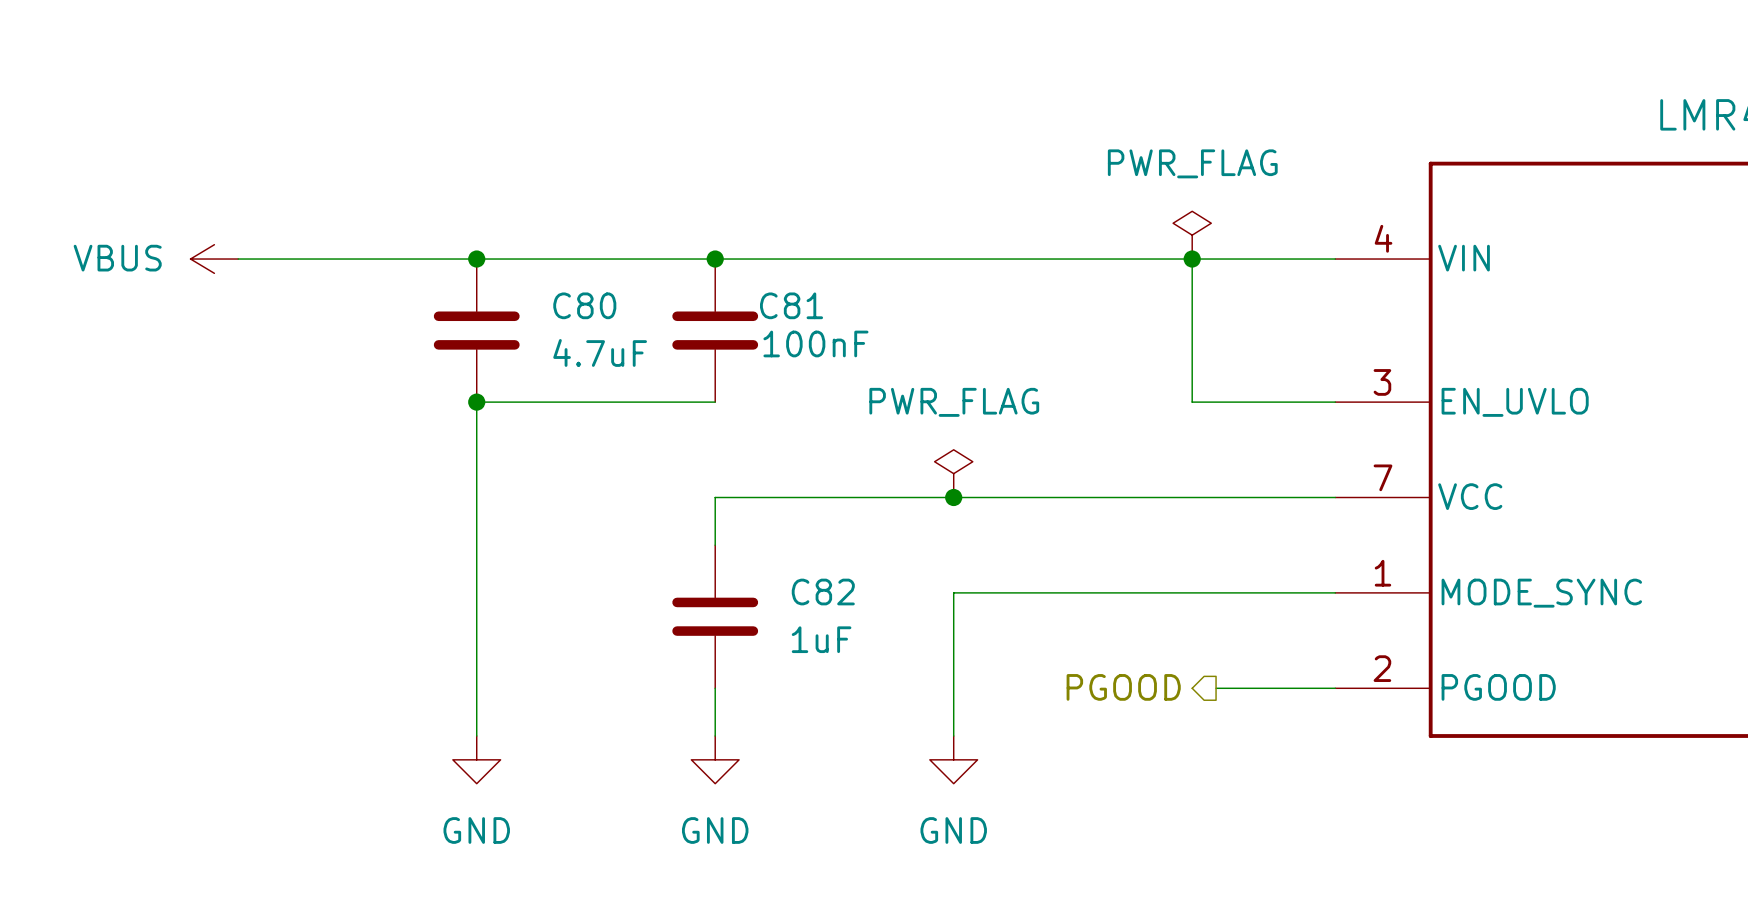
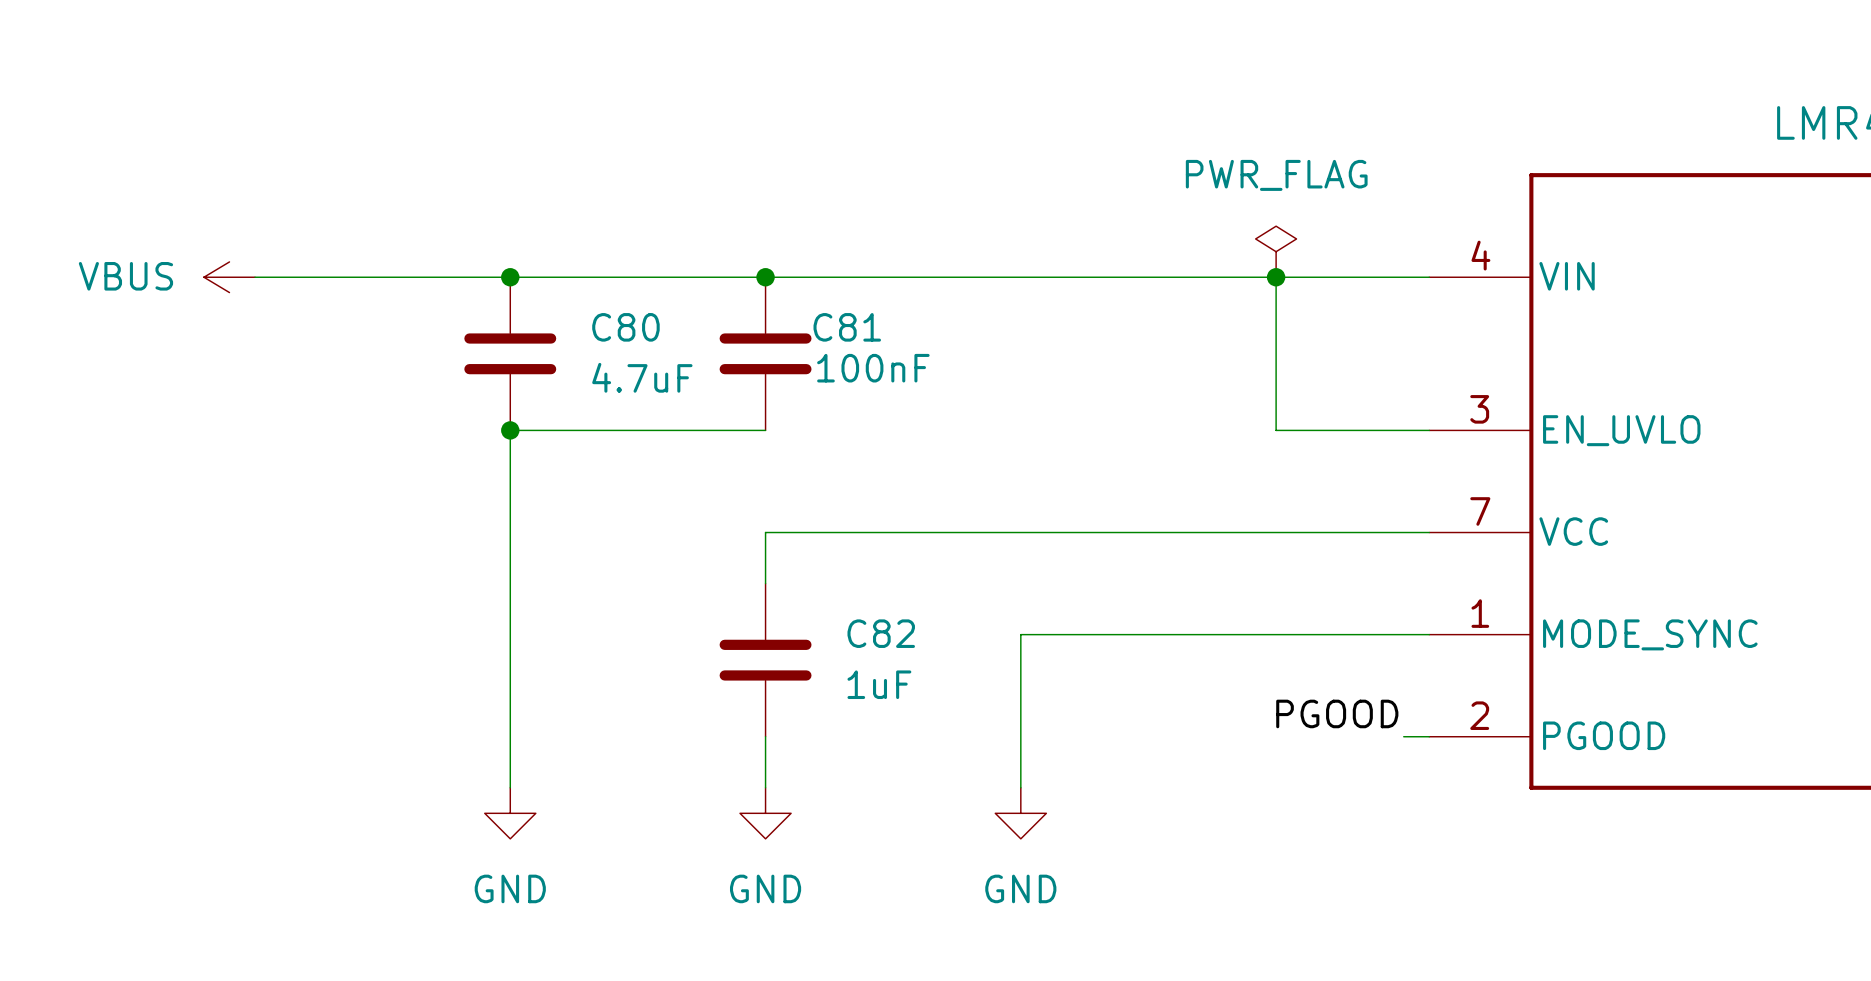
power symbol: PWR_FLAG (953, 473) -> none
junction: (953, 497) -> none
label: none -> PGOOD (1337, 713)
hierarchical label: PGOOD (1123, 687) -> none
wire: (1216, 688) (1311, 688) -> none

